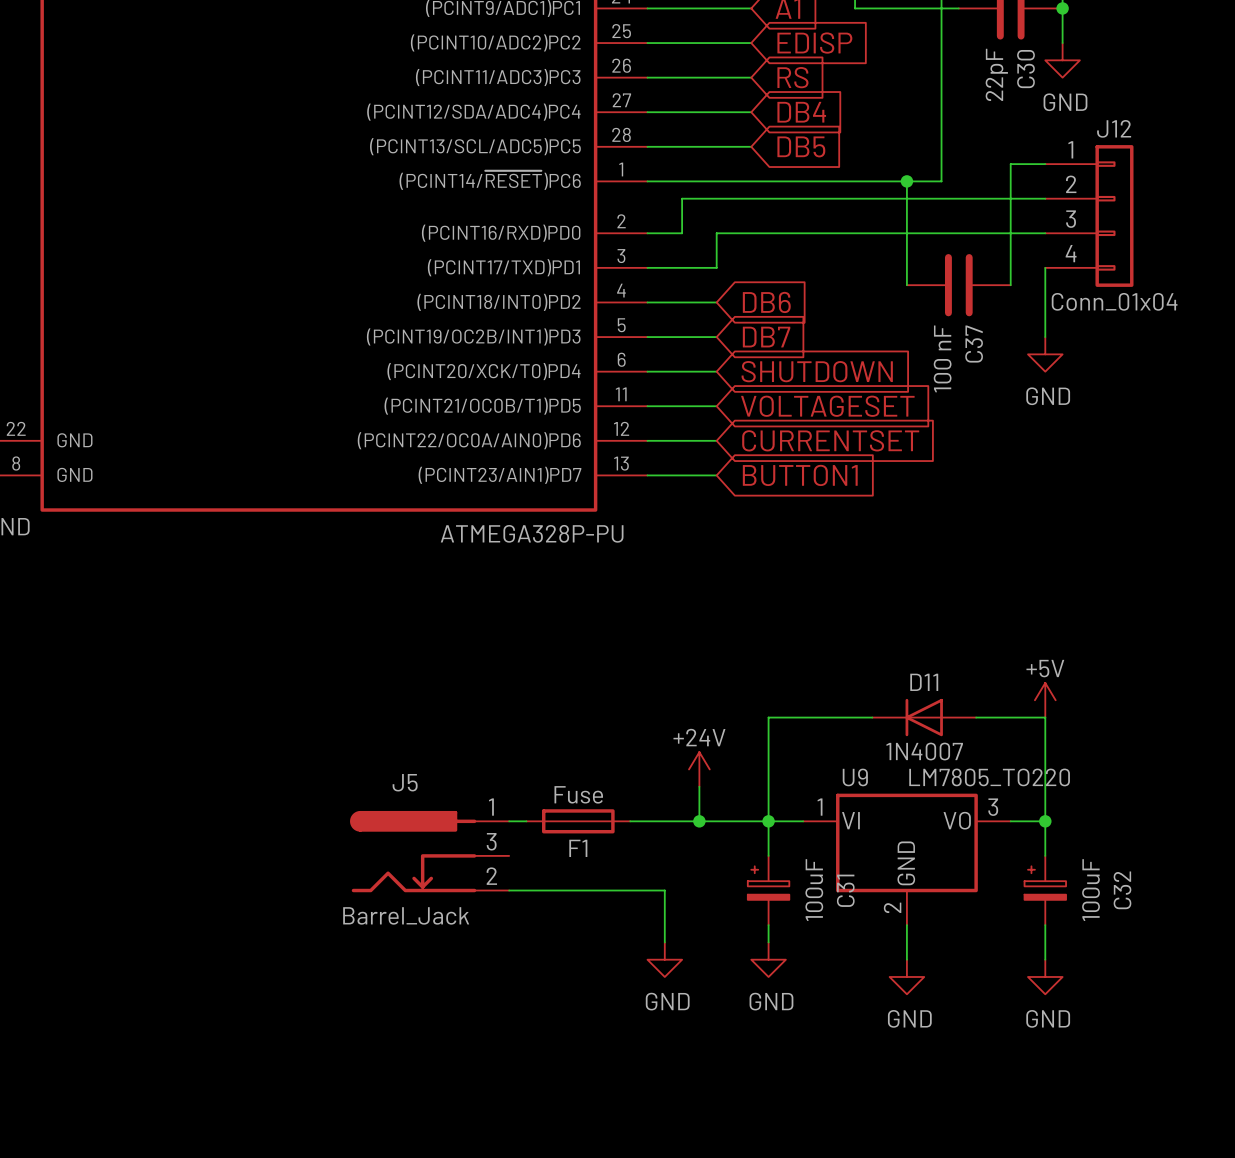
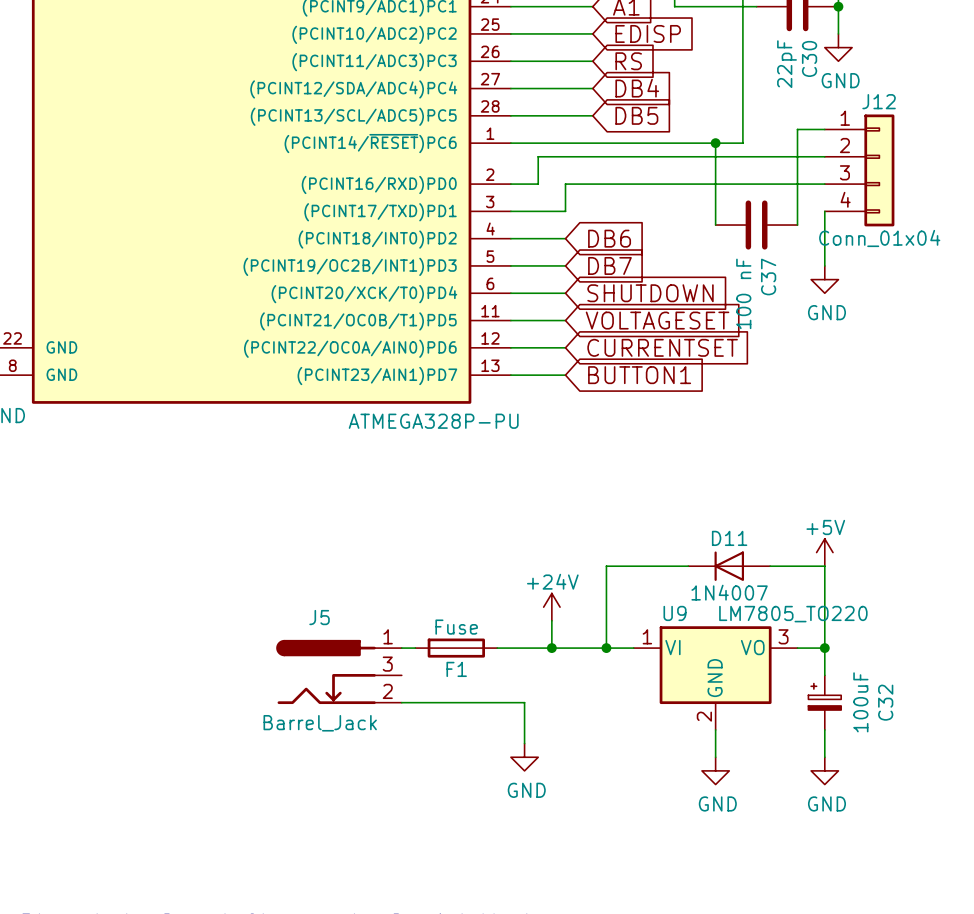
wire: (768, 821) (768, 855) -> none
C31: 100uF (768, 890) -> none
wire: (768, 925) (768, 942) -> none
power symbol: GND (768, 959) -> none

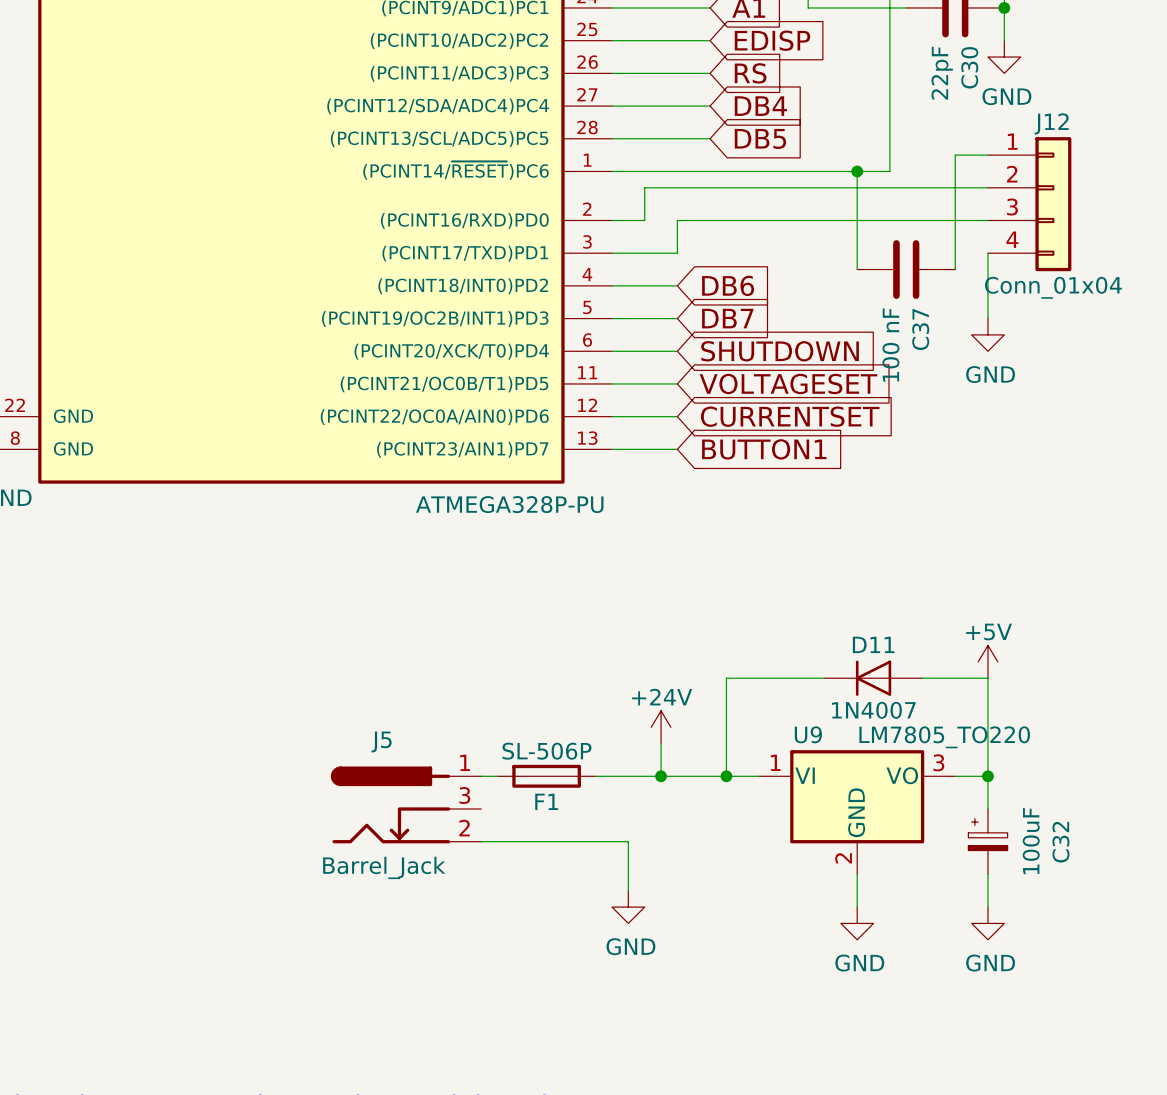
F1 value: Fuse (456, 627) -> SL-506P (546, 751)

